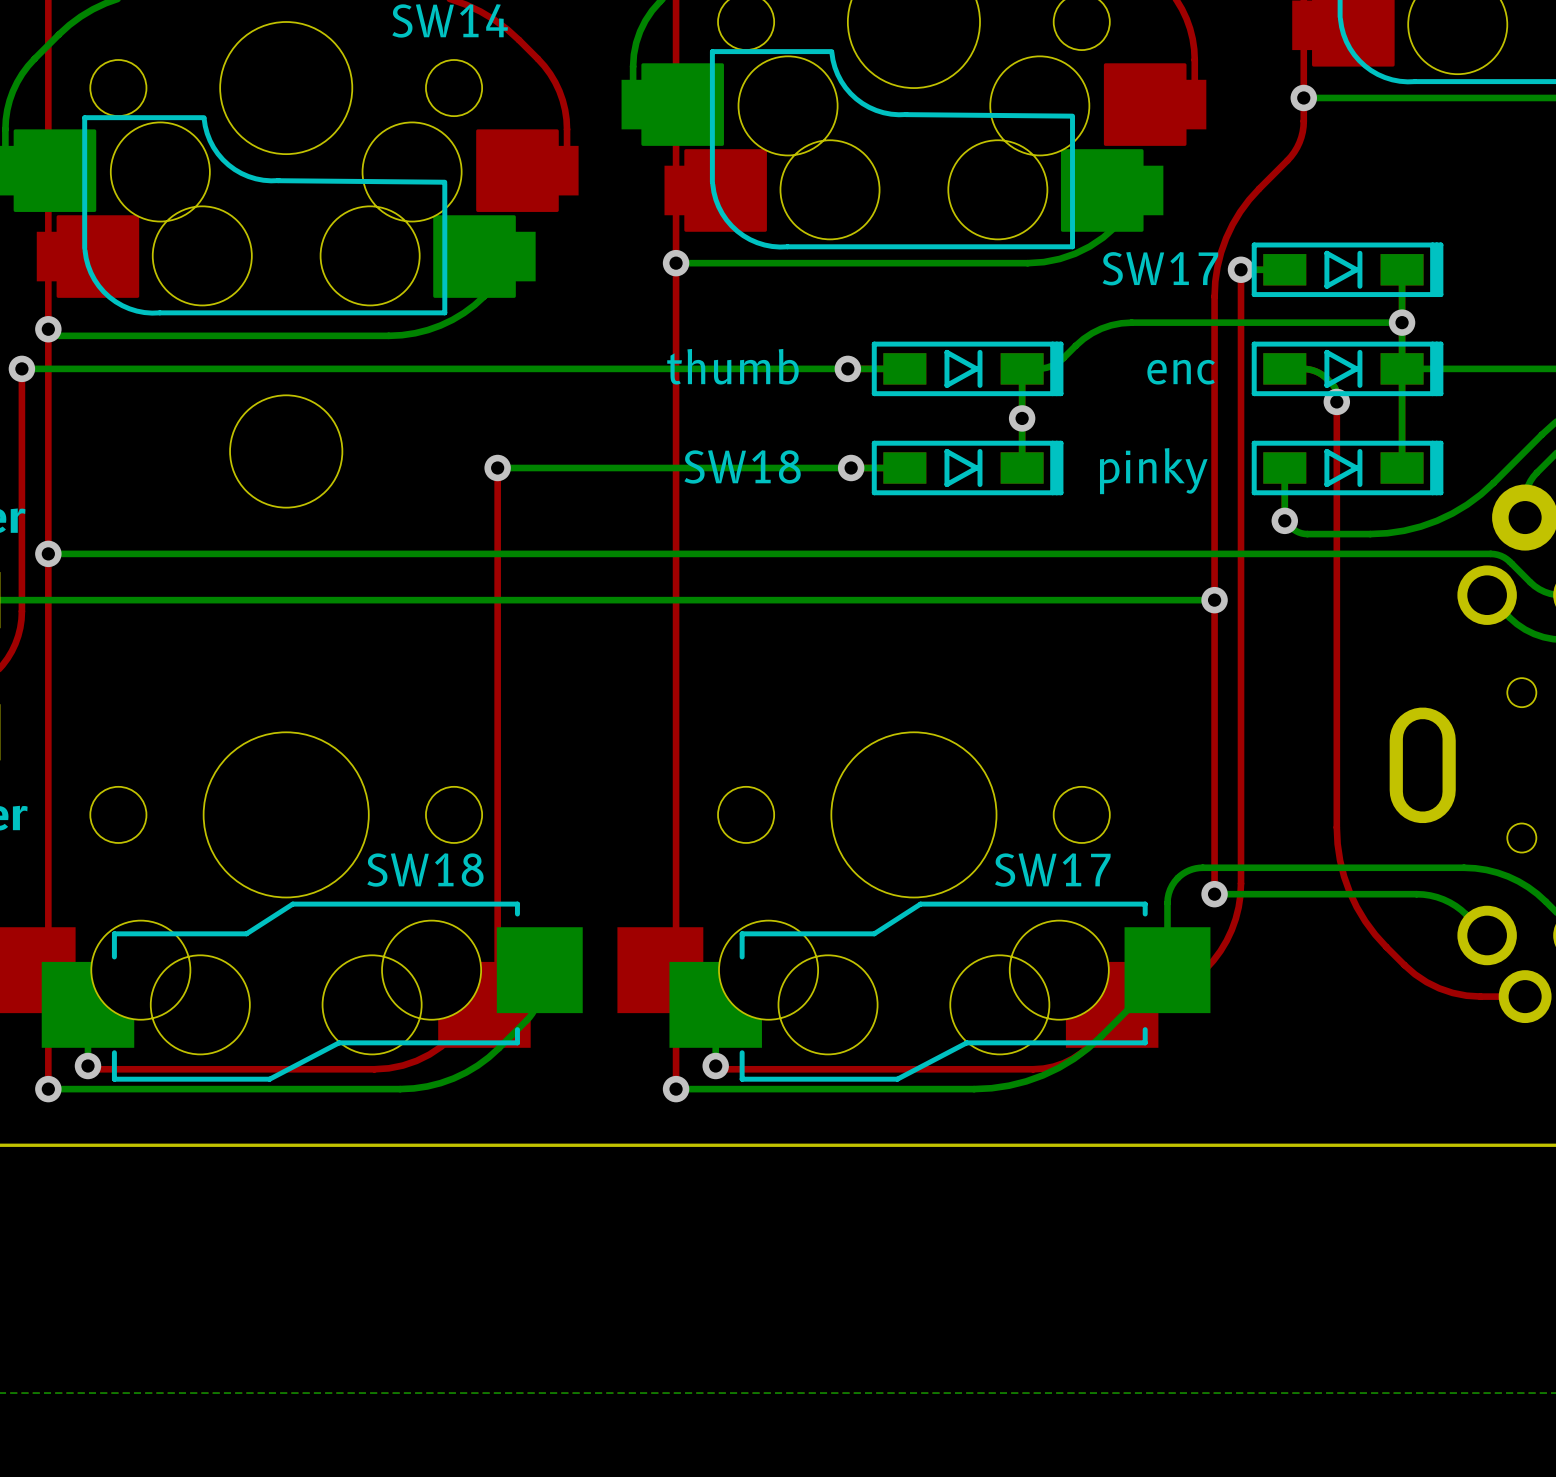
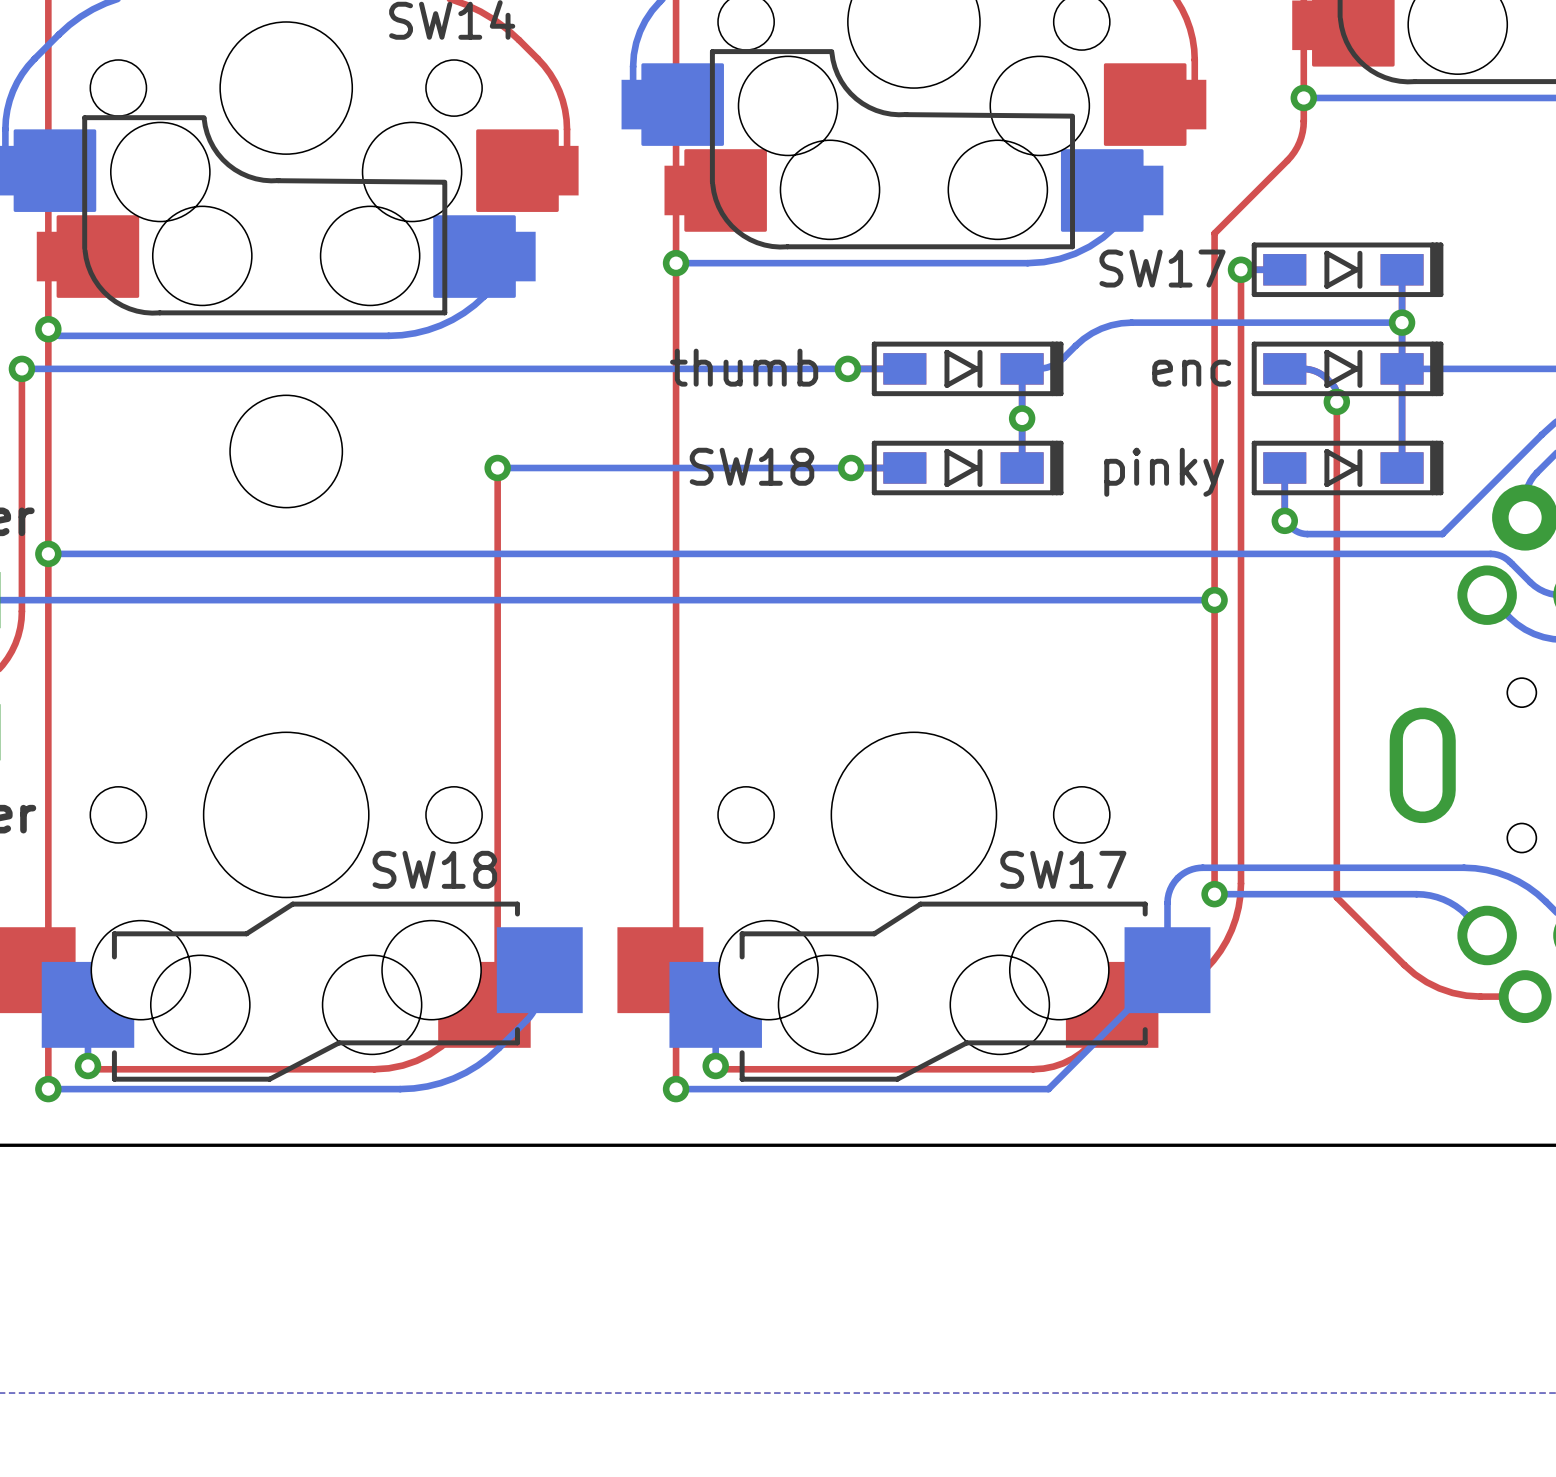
top track: (1259, 188) (1240, 211) (1226, 238) (1217, 266) (1214, 296) -> (1259, 188) (1214, 233) (1214, 296)
bottom track: (1493, 482) (1467, 504) (1437, 520) (1404, 530) (1370, 534) -> (1493, 482) (1442, 534) (1370, 534)
top track: (1336, 827) (1340, 860) (1349, 892) (1365, 921) (1386, 947) -> (1336, 827) (1336, 897) (1386, 947)
bottom track: (1101, 1036) (1073, 1058) (1042, 1075) (1009, 1085) (974, 1089) -> (1101, 1036) (1048, 1089) (974, 1089)

